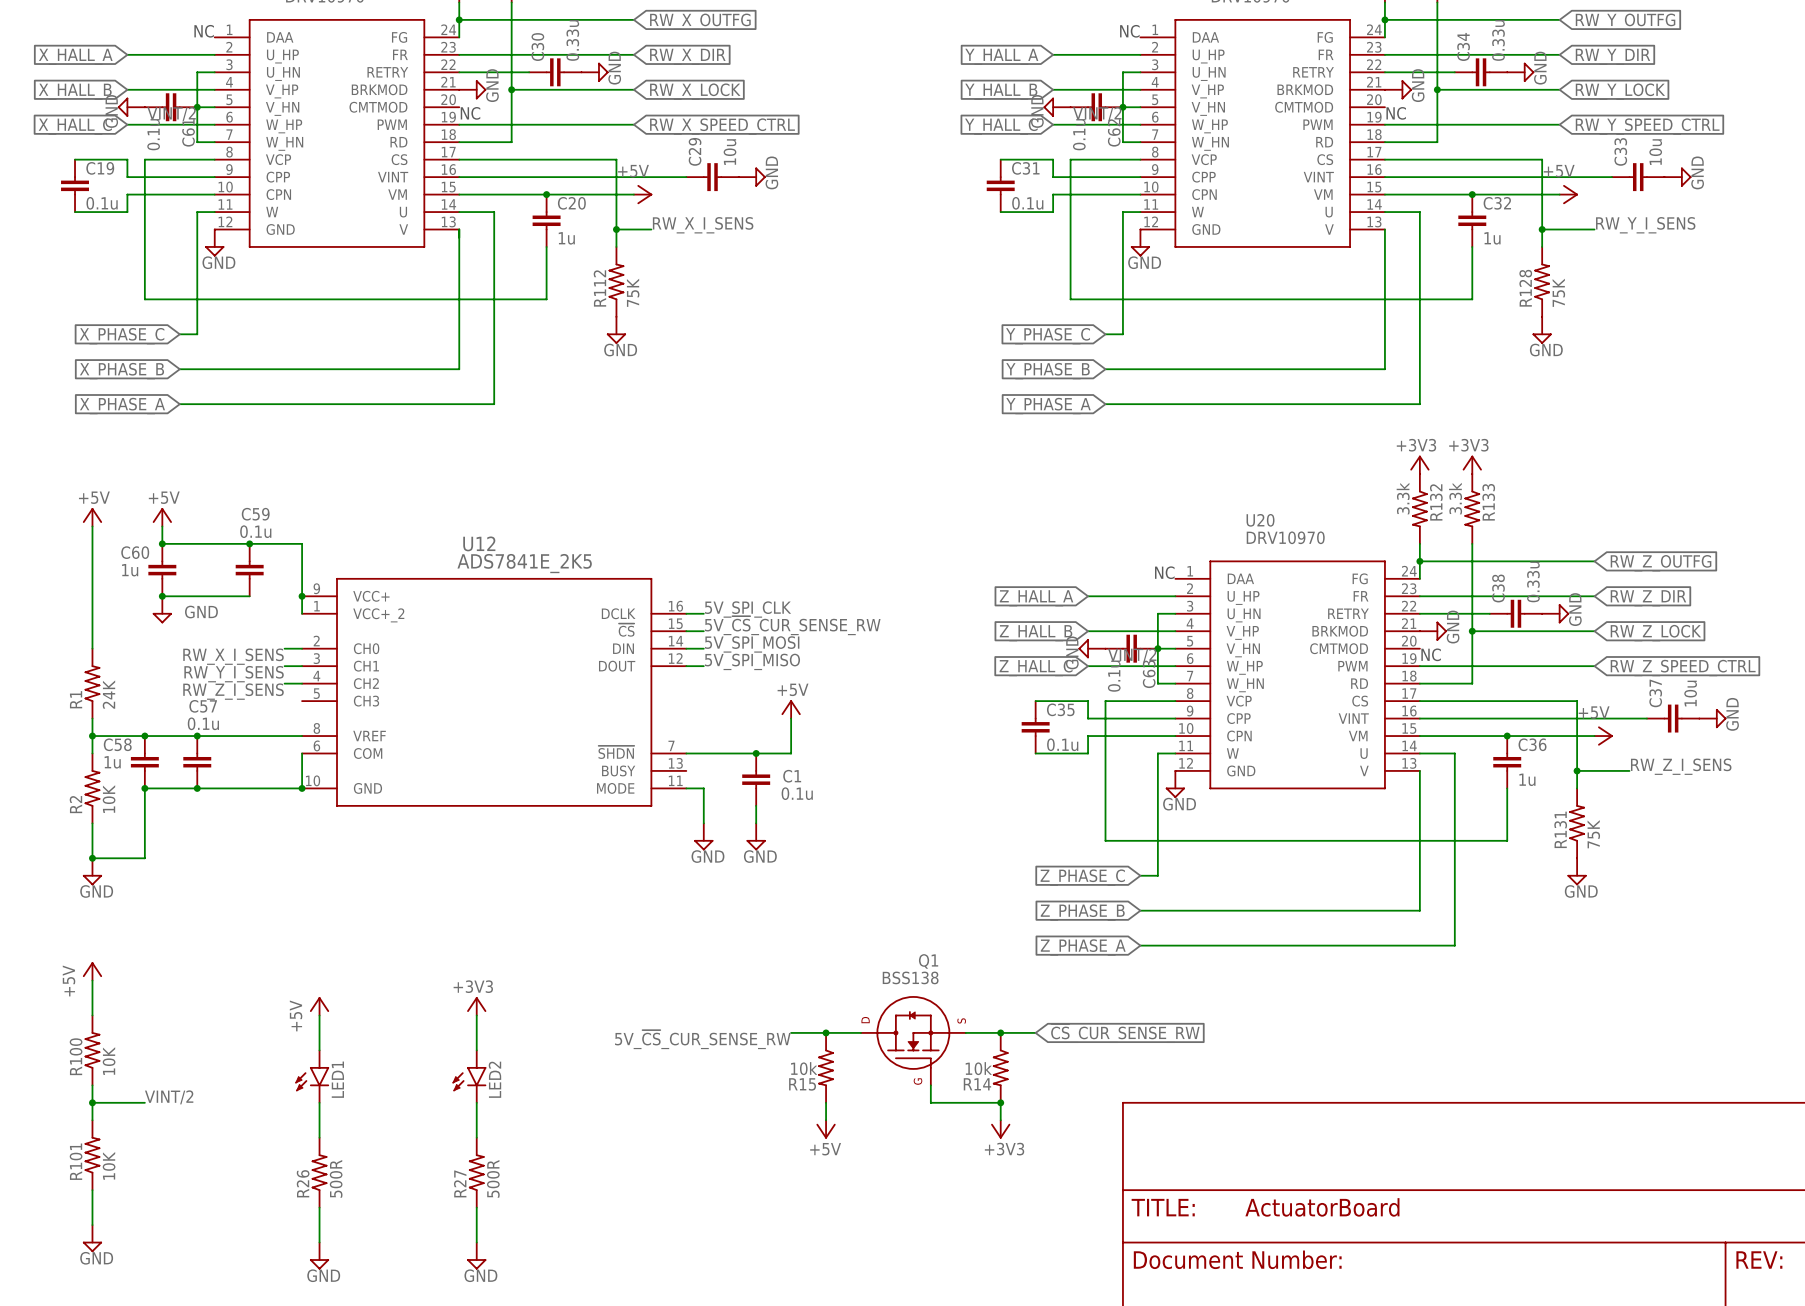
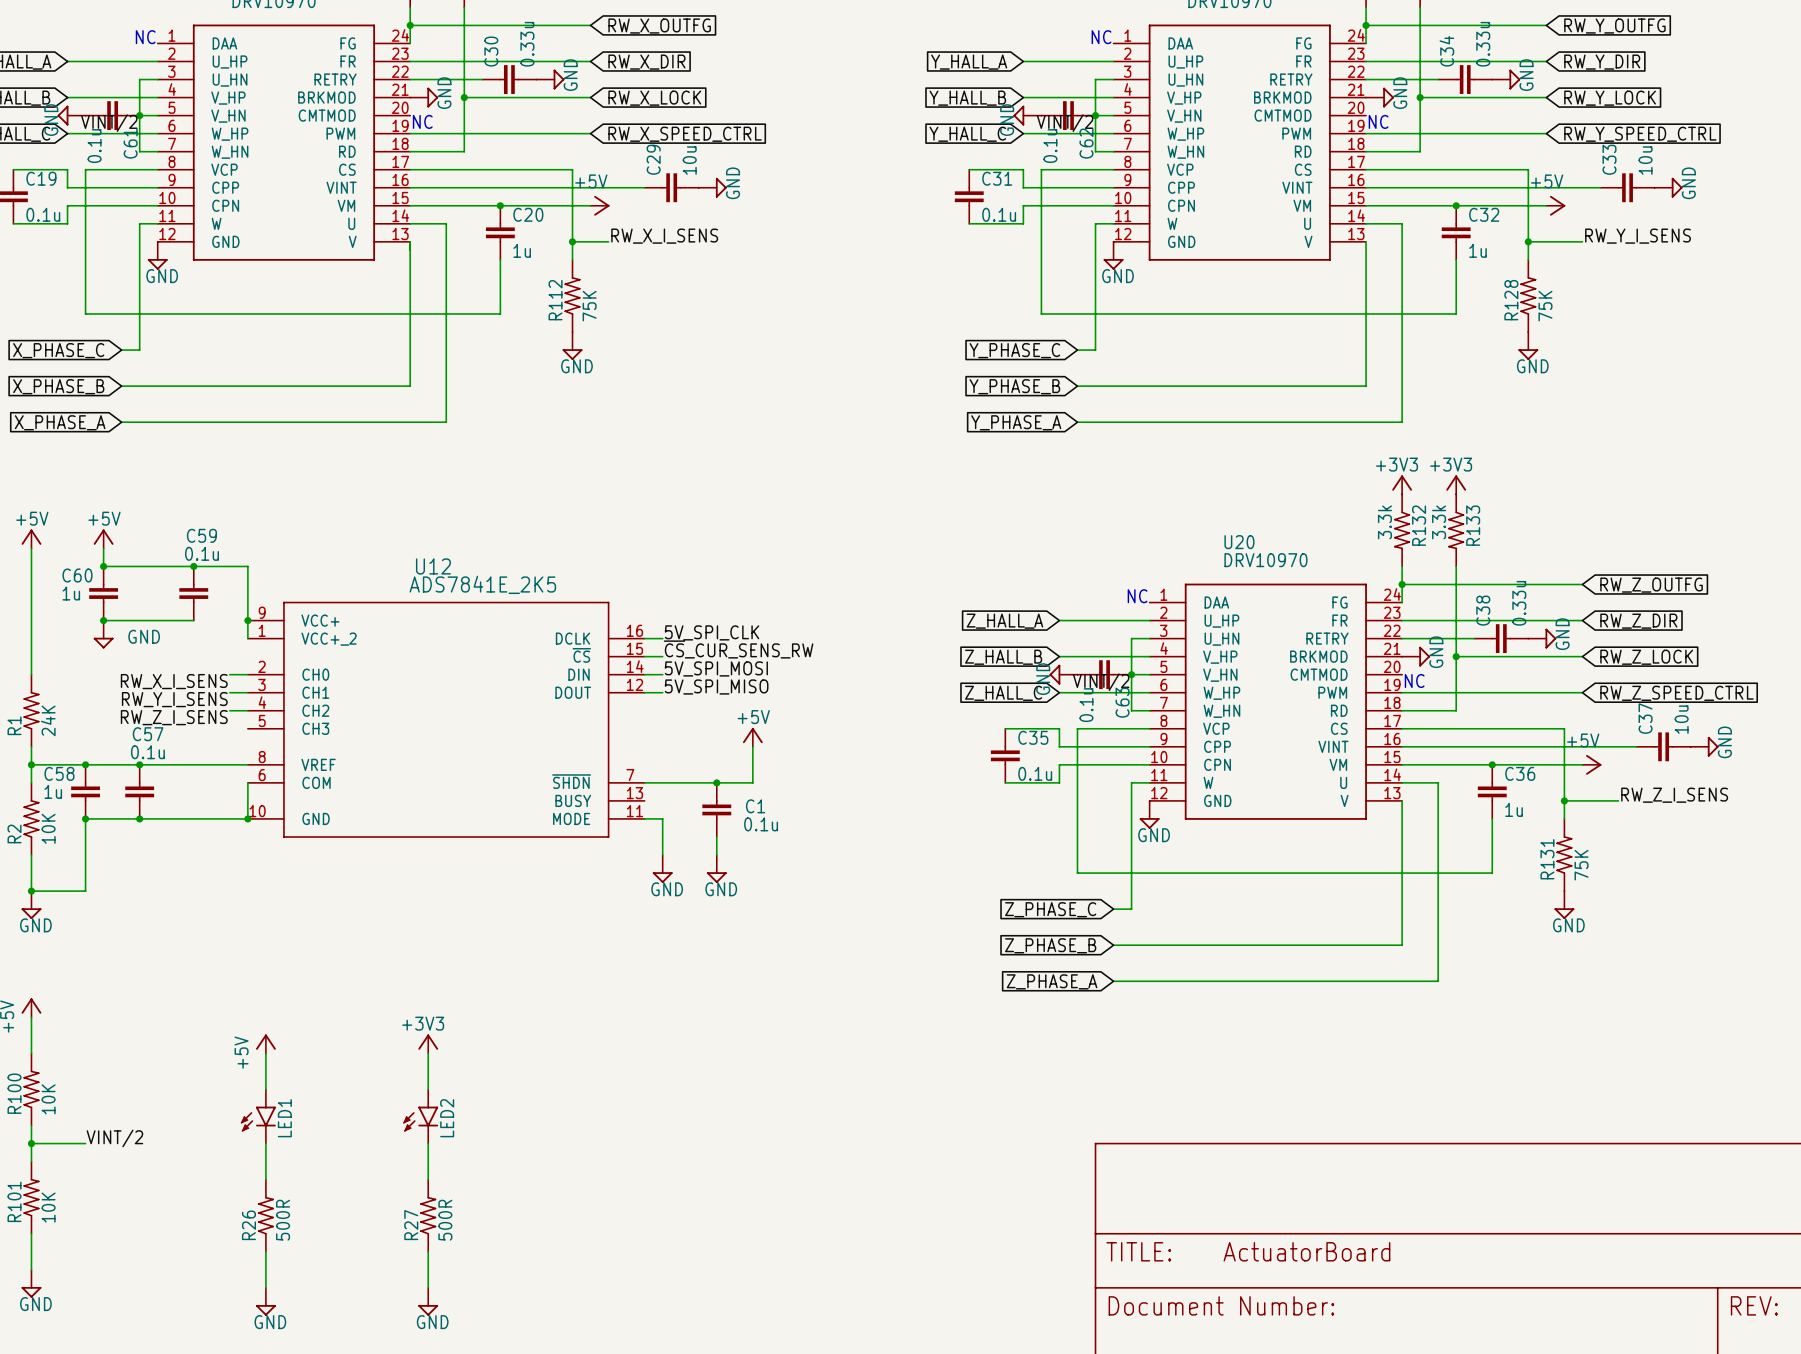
label: 5V_~{CS}_CUR_SENSE_RW (792, 625) -> ~{CS}_CUR_SENS_RW (738, 649)
wire: (791, 1032) (860, 1032) -> none
junction: (826, 1032) -> none
wire: (965, 1032) (1035, 1032) -> none
junction: (1000, 1032) -> none
global label: ~{CS}_CUR_SENSE_RW (1125, 1033) -> none
label: 5V_~{CS}_CUR_SENSE_RW (702, 1039) -> none
Q1: BSS138 (913, 1040) -> none
R15: 10k (826, 1067) -> none
R14: 10k (1000, 1067) -> none
wire: (930, 1085) (930, 1102) (1000, 1102) (1000, 1120) -> none
wire: (826, 1102) (826, 1120) -> none
junction: (1000, 1102) -> none
power symbol: +5V (826, 1129) -> none
power symbol: +3V3 (1000, 1129) -> none

